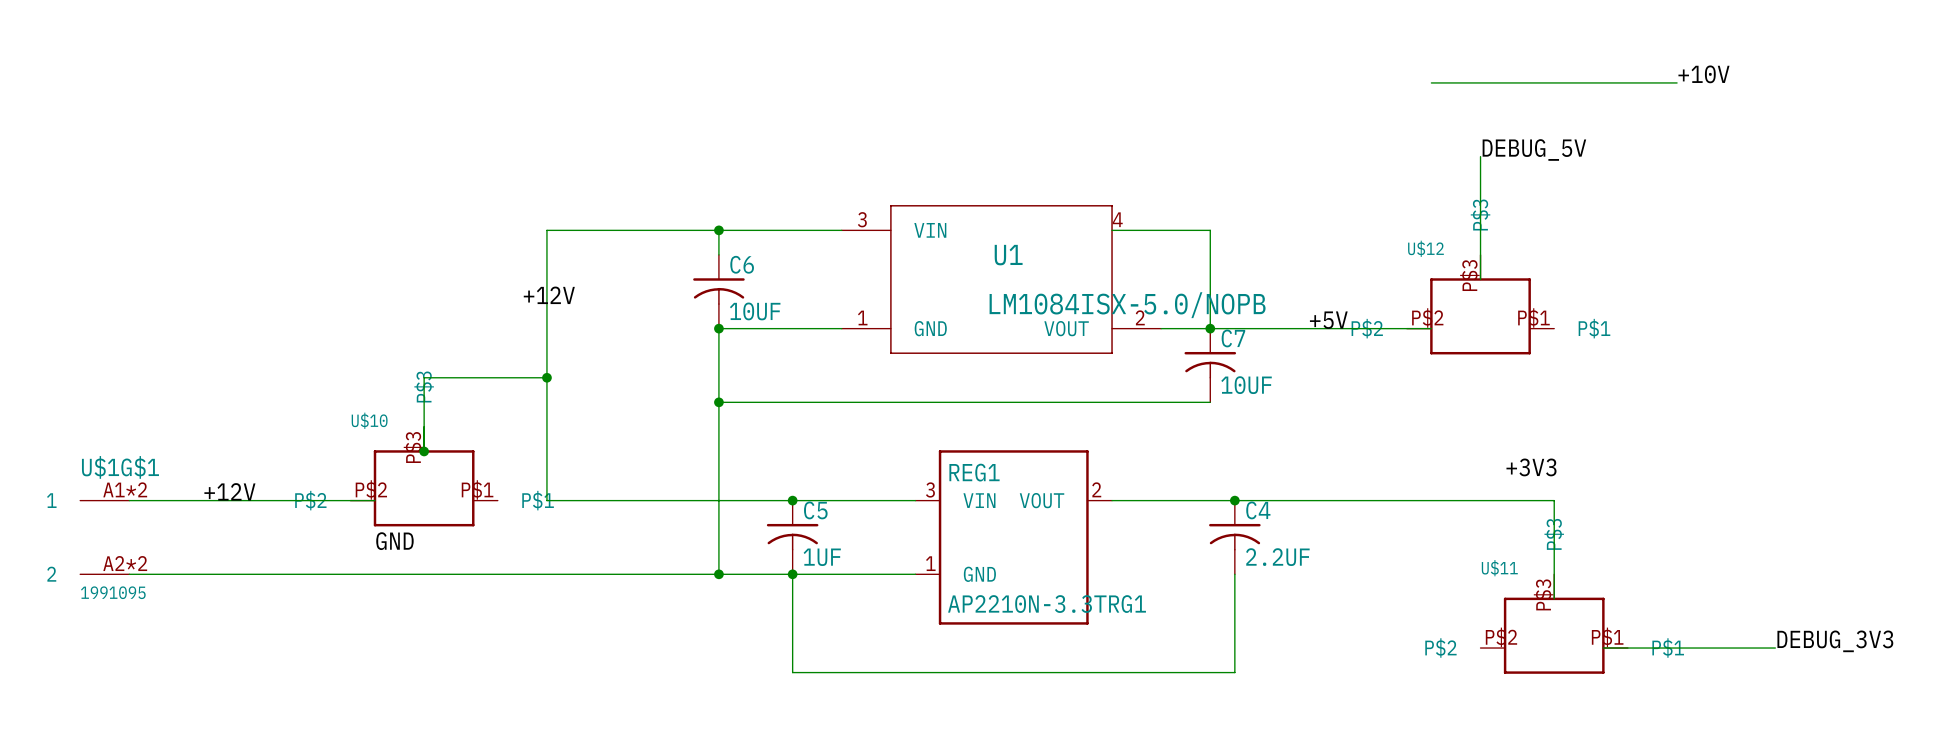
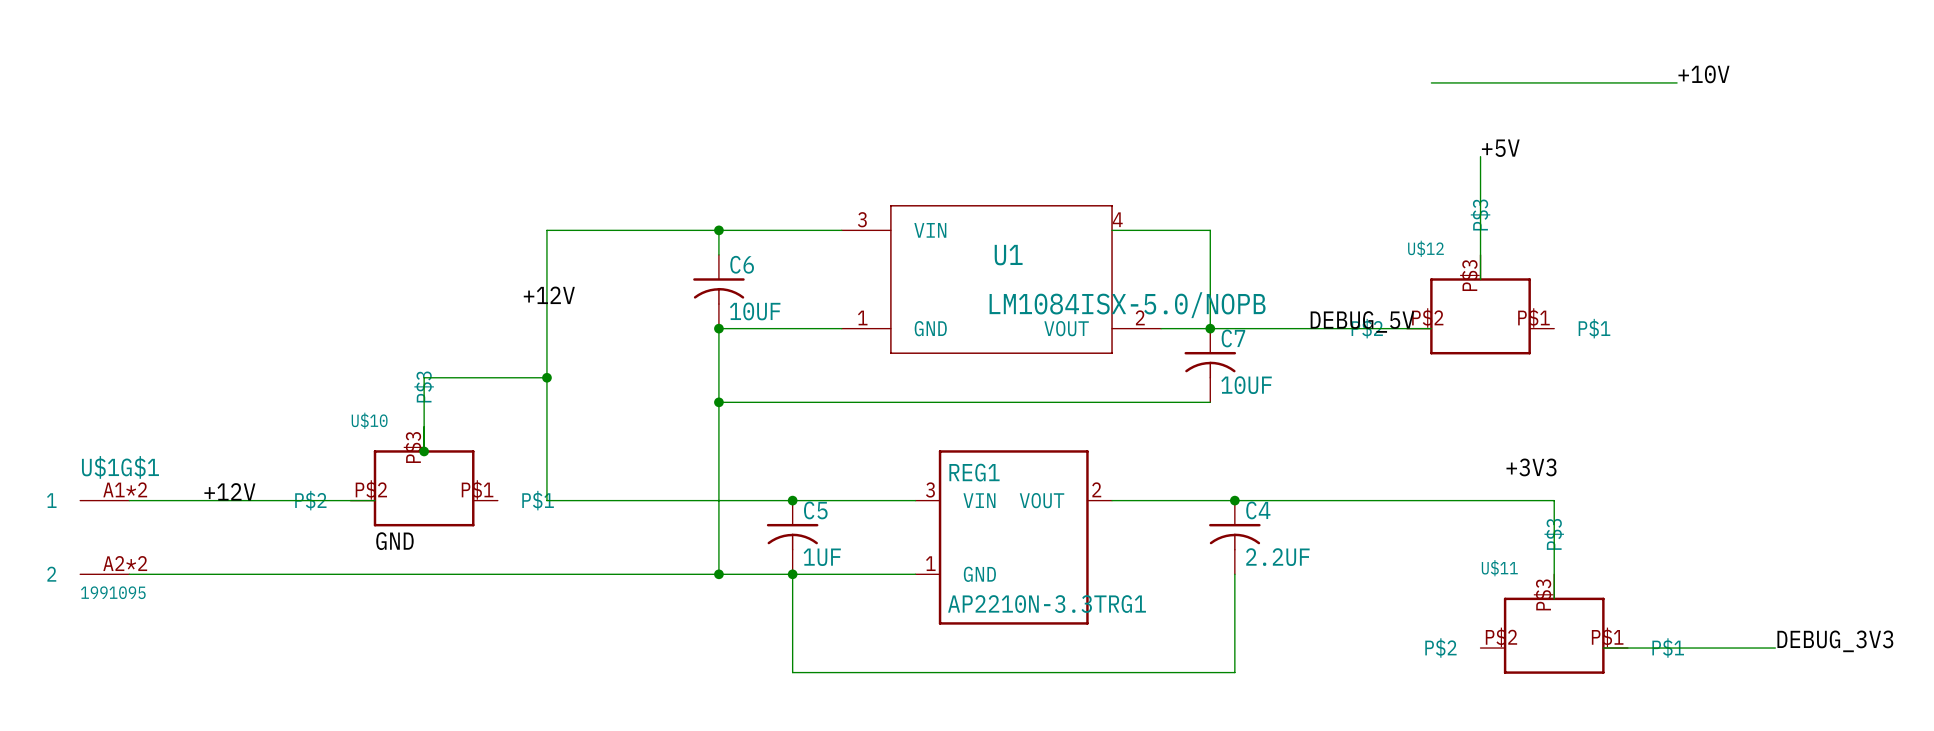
label: DEBUG_5V (1534, 150) -> +5V (1500, 148)
label: +5V (1328, 320) -> DEBUG_5V (1362, 321)

